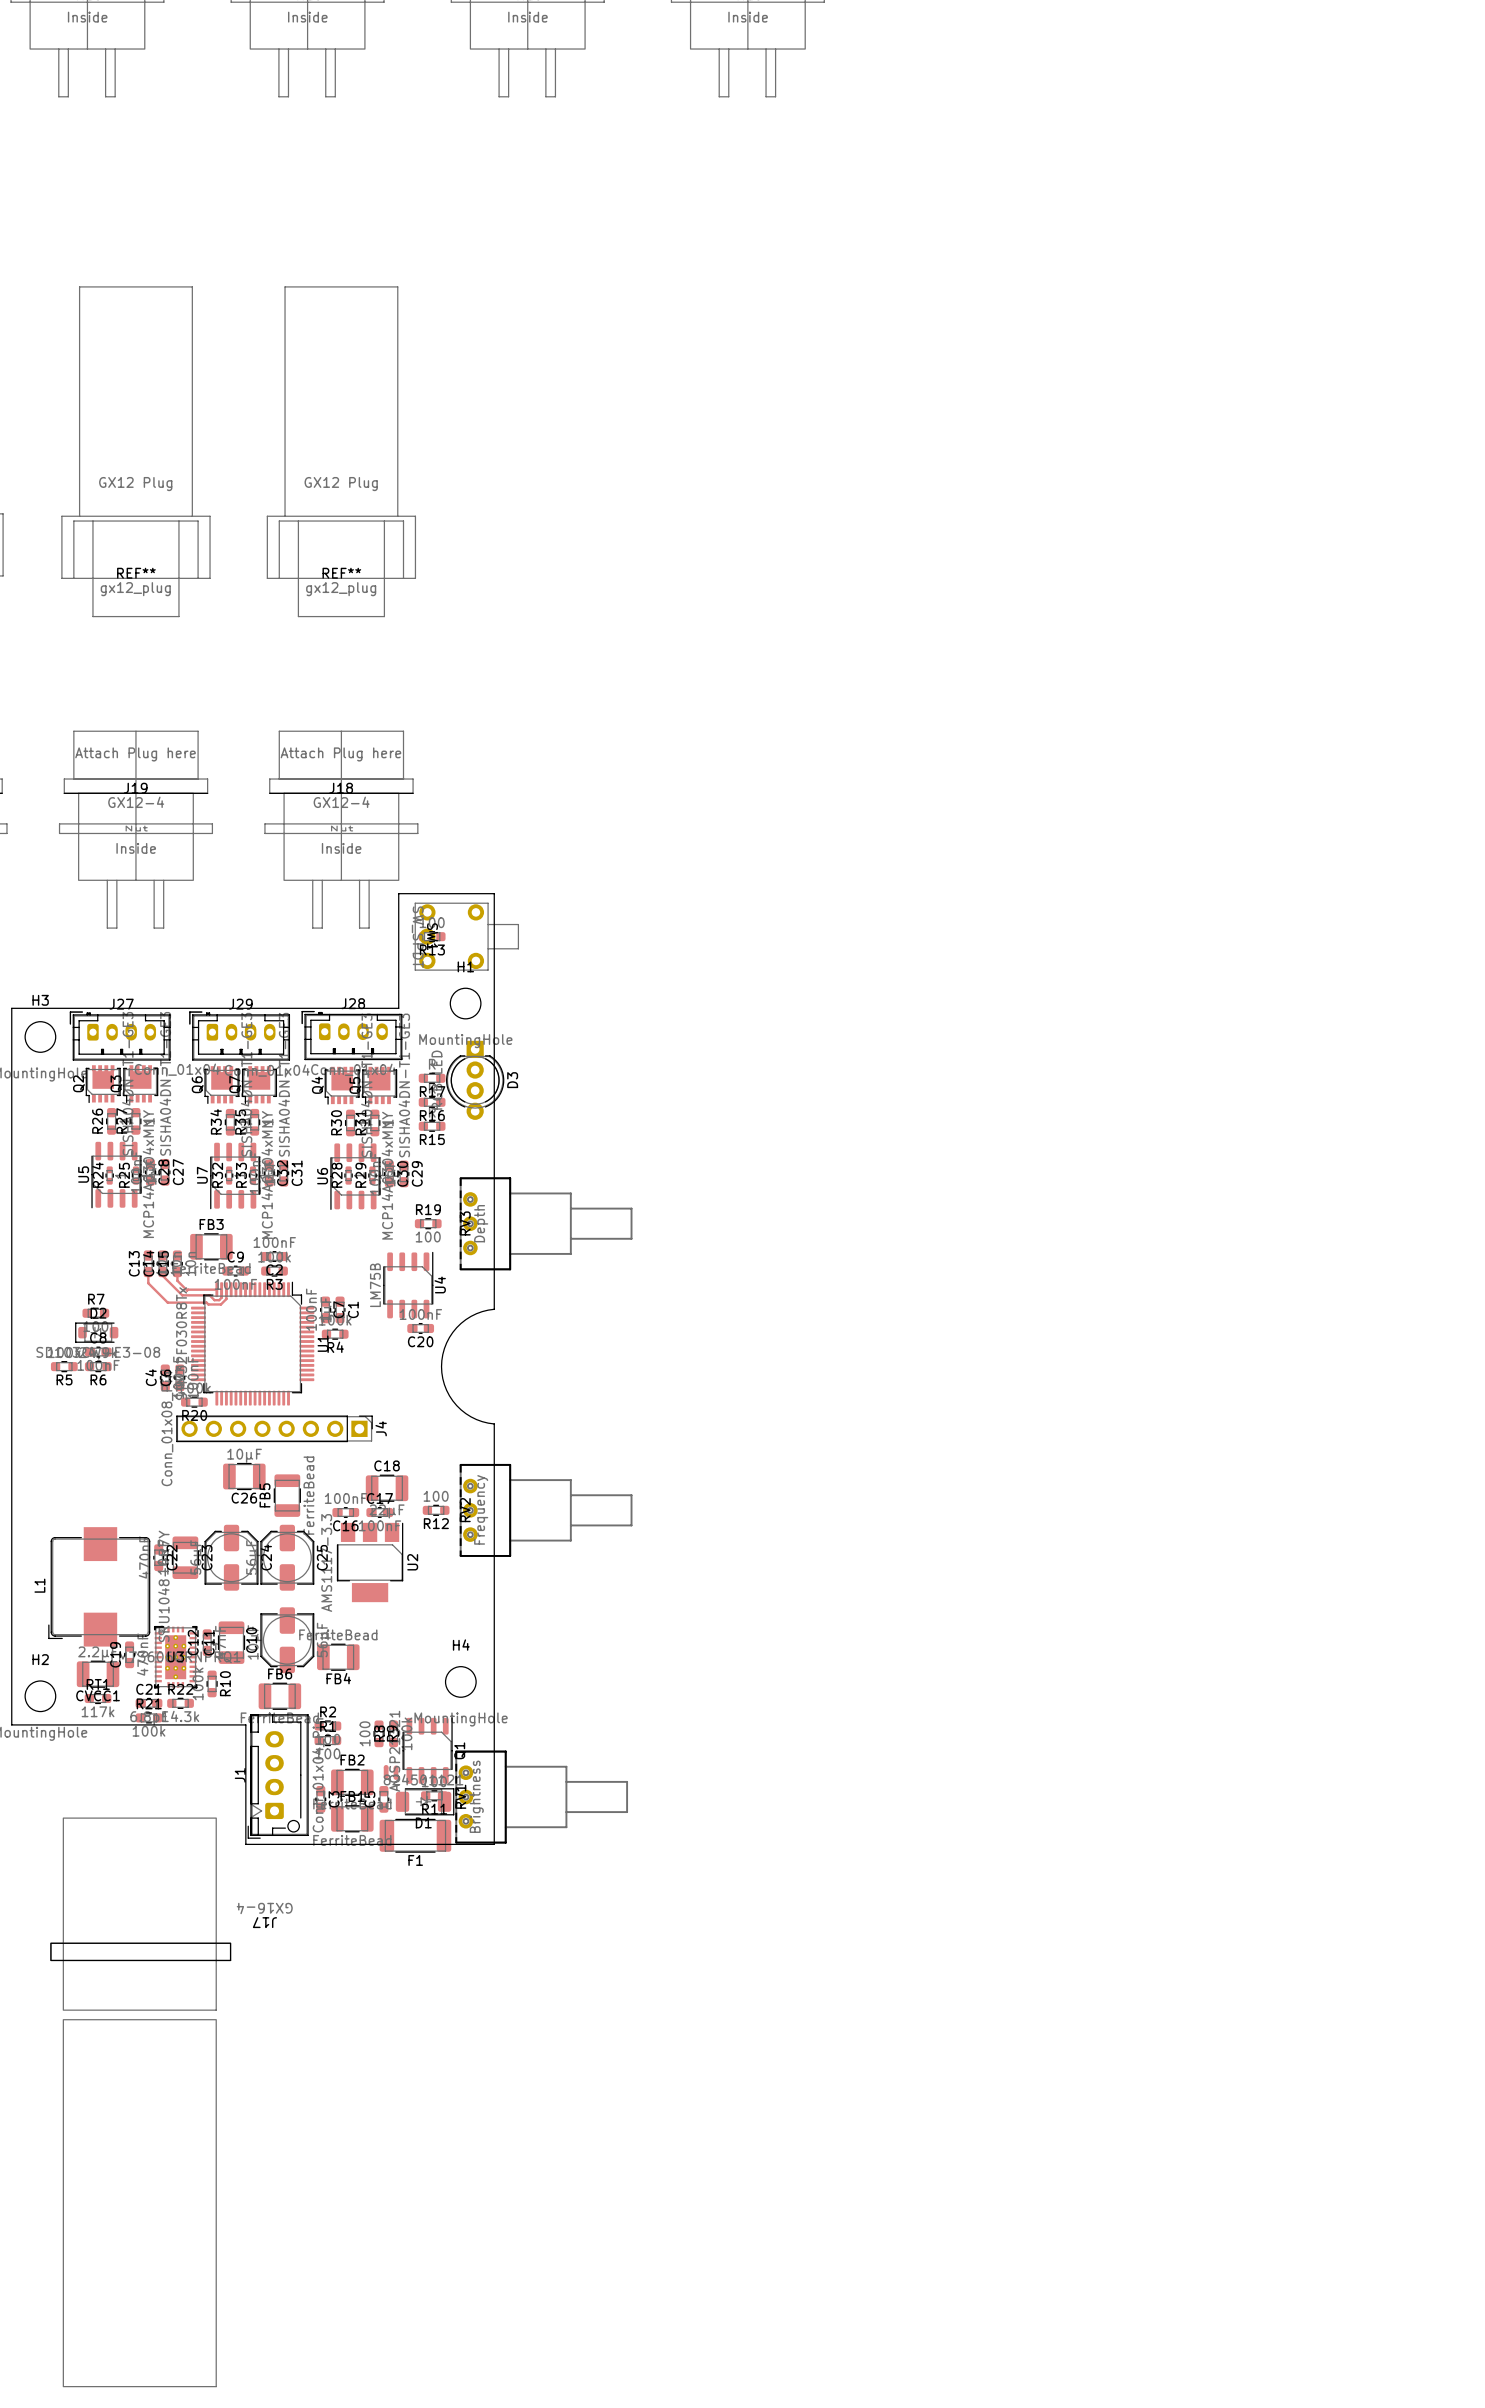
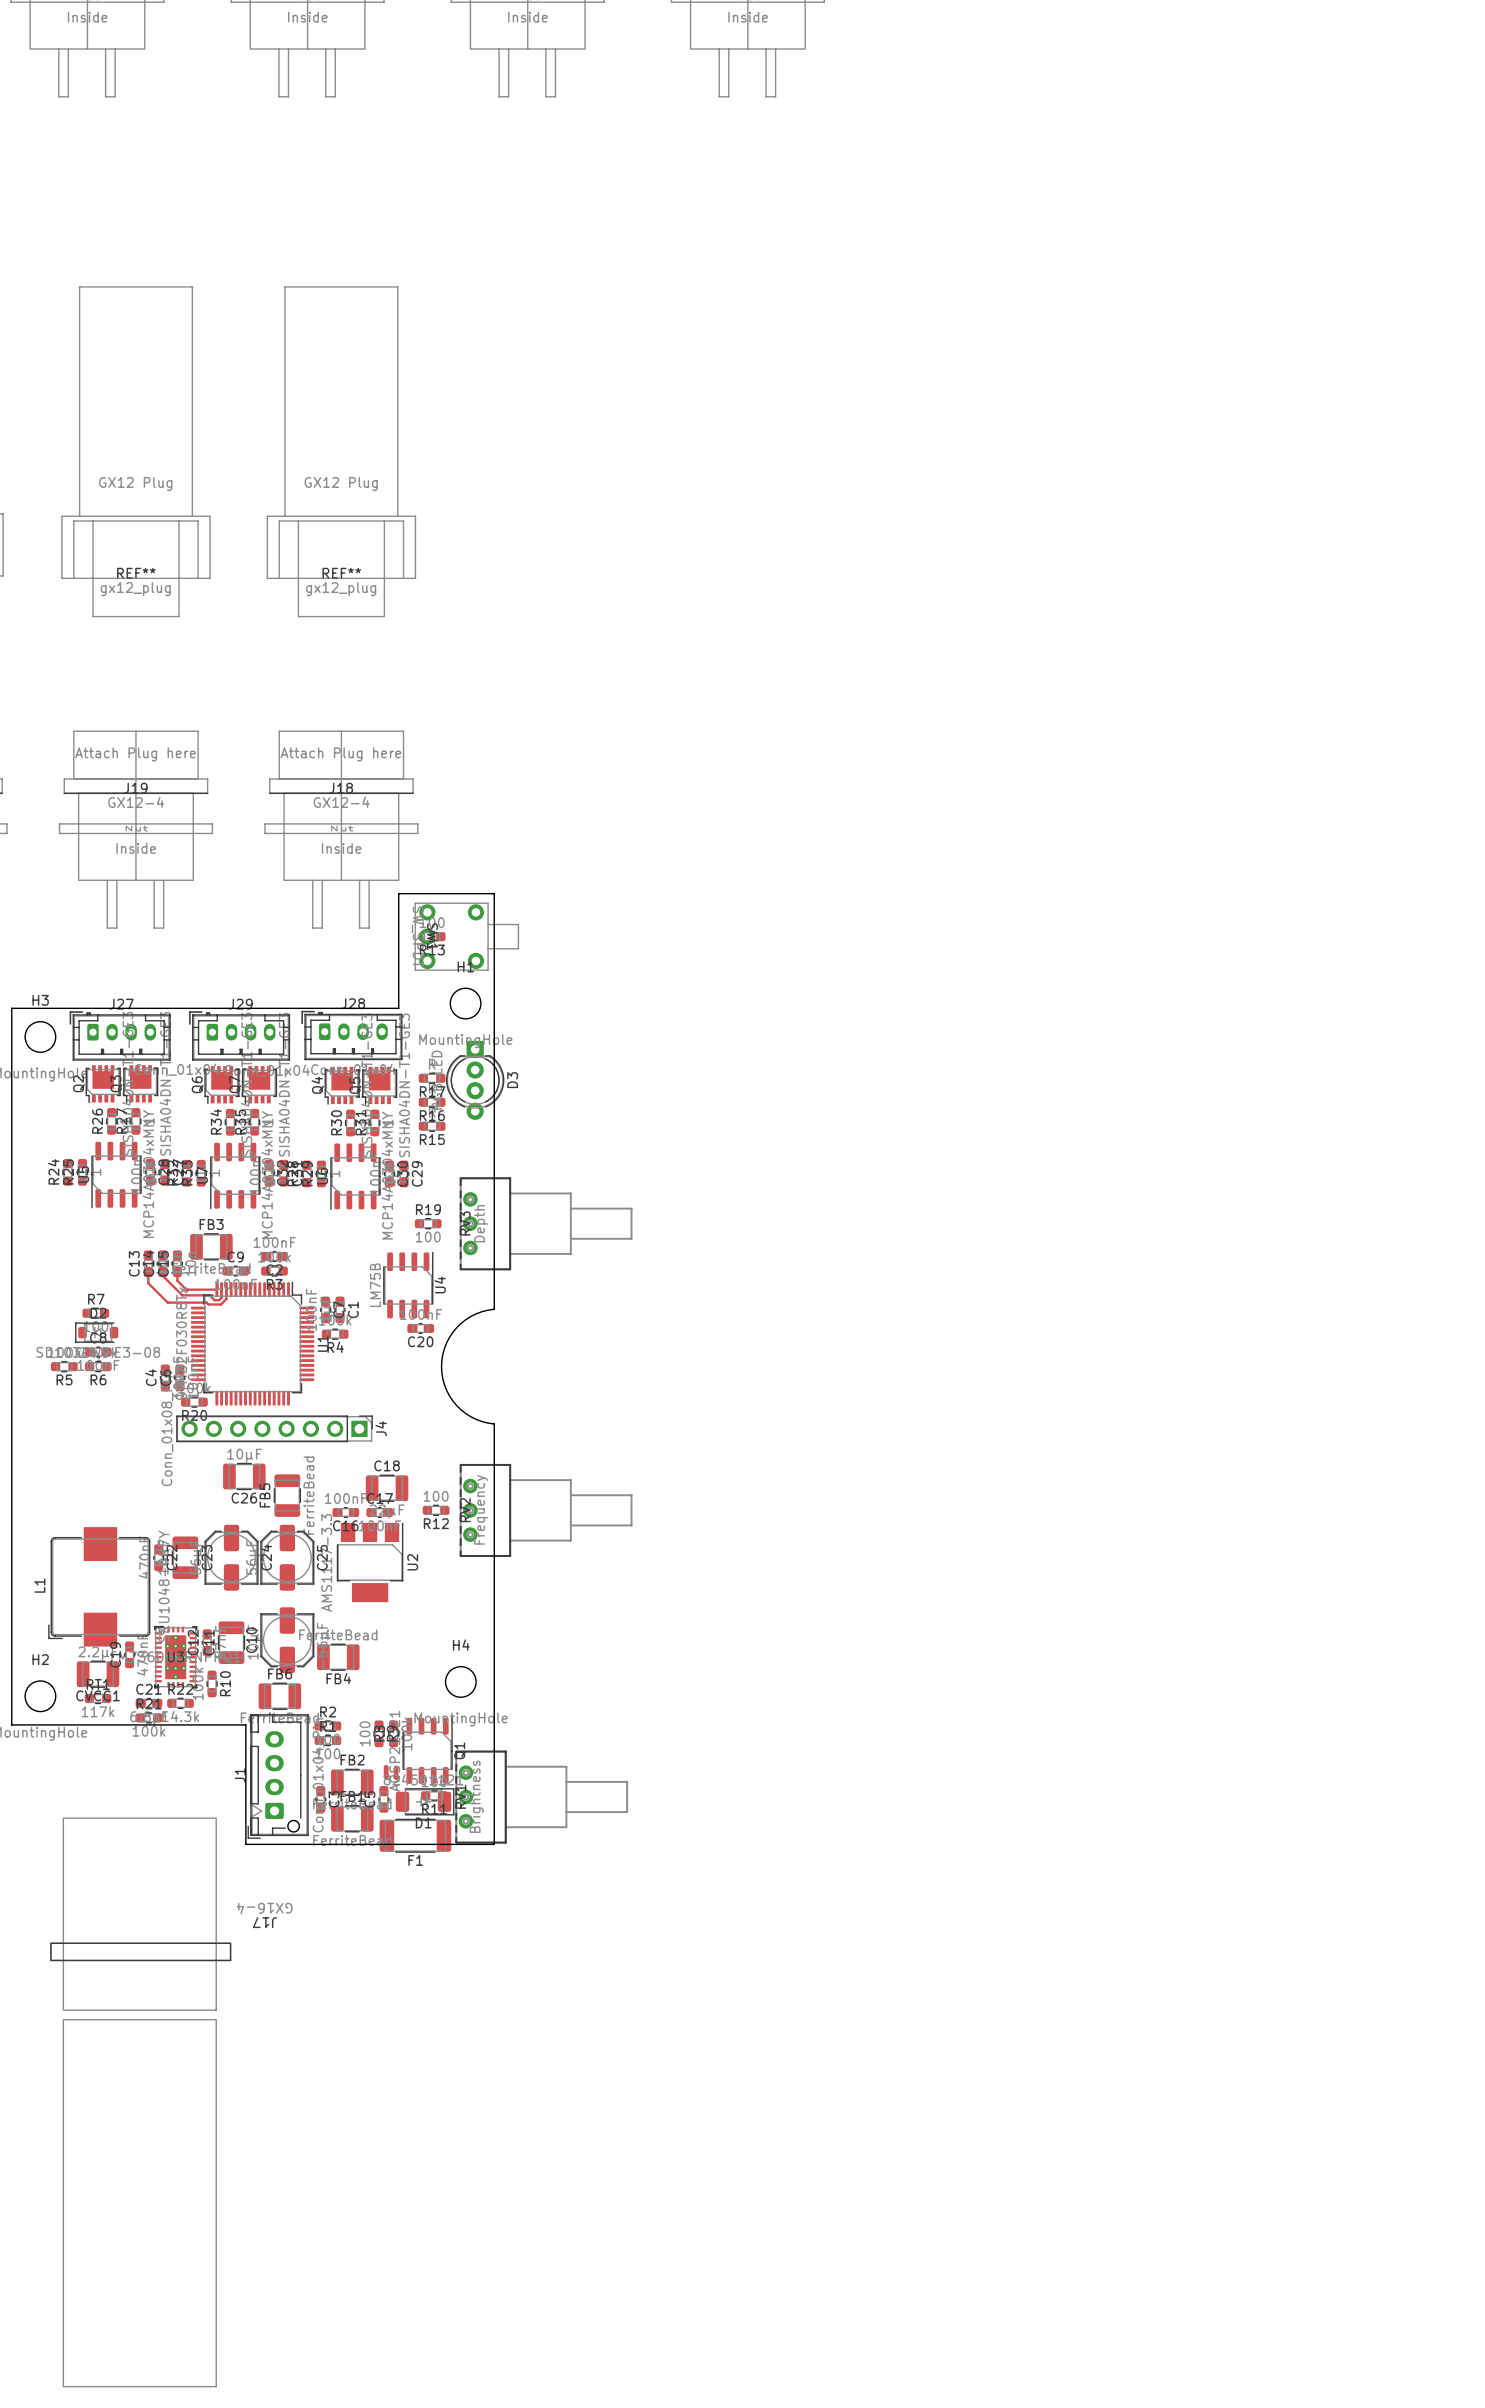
R24 footprint: [105, 1166, 114, 1185] -> [62, 1158, 74, 1186]
R25 footprint: [131, 1166, 141, 1185] -> [76, 1158, 89, 1186]
R32 footprint: [224, 1166, 234, 1185] -> [181, 1159, 193, 1187]
R33 footprint: [248, 1166, 258, 1185] -> [195, 1159, 207, 1187]
R28 footprint: [344, 1166, 353, 1185] -> [301, 1160, 313, 1188]
R29 footprint: [368, 1166, 377, 1185] -> [315, 1160, 328, 1188]

